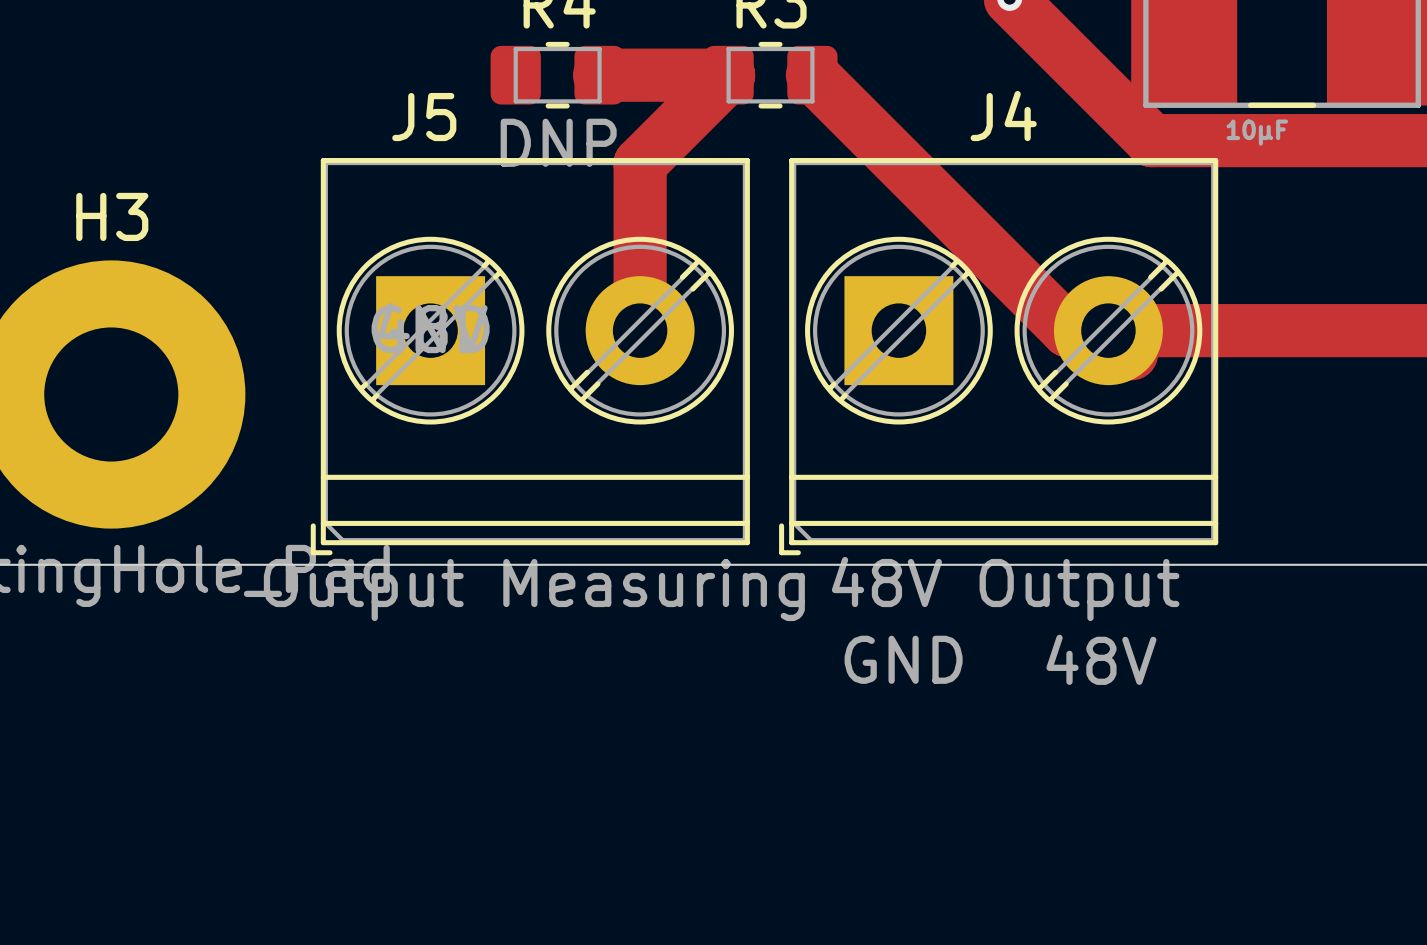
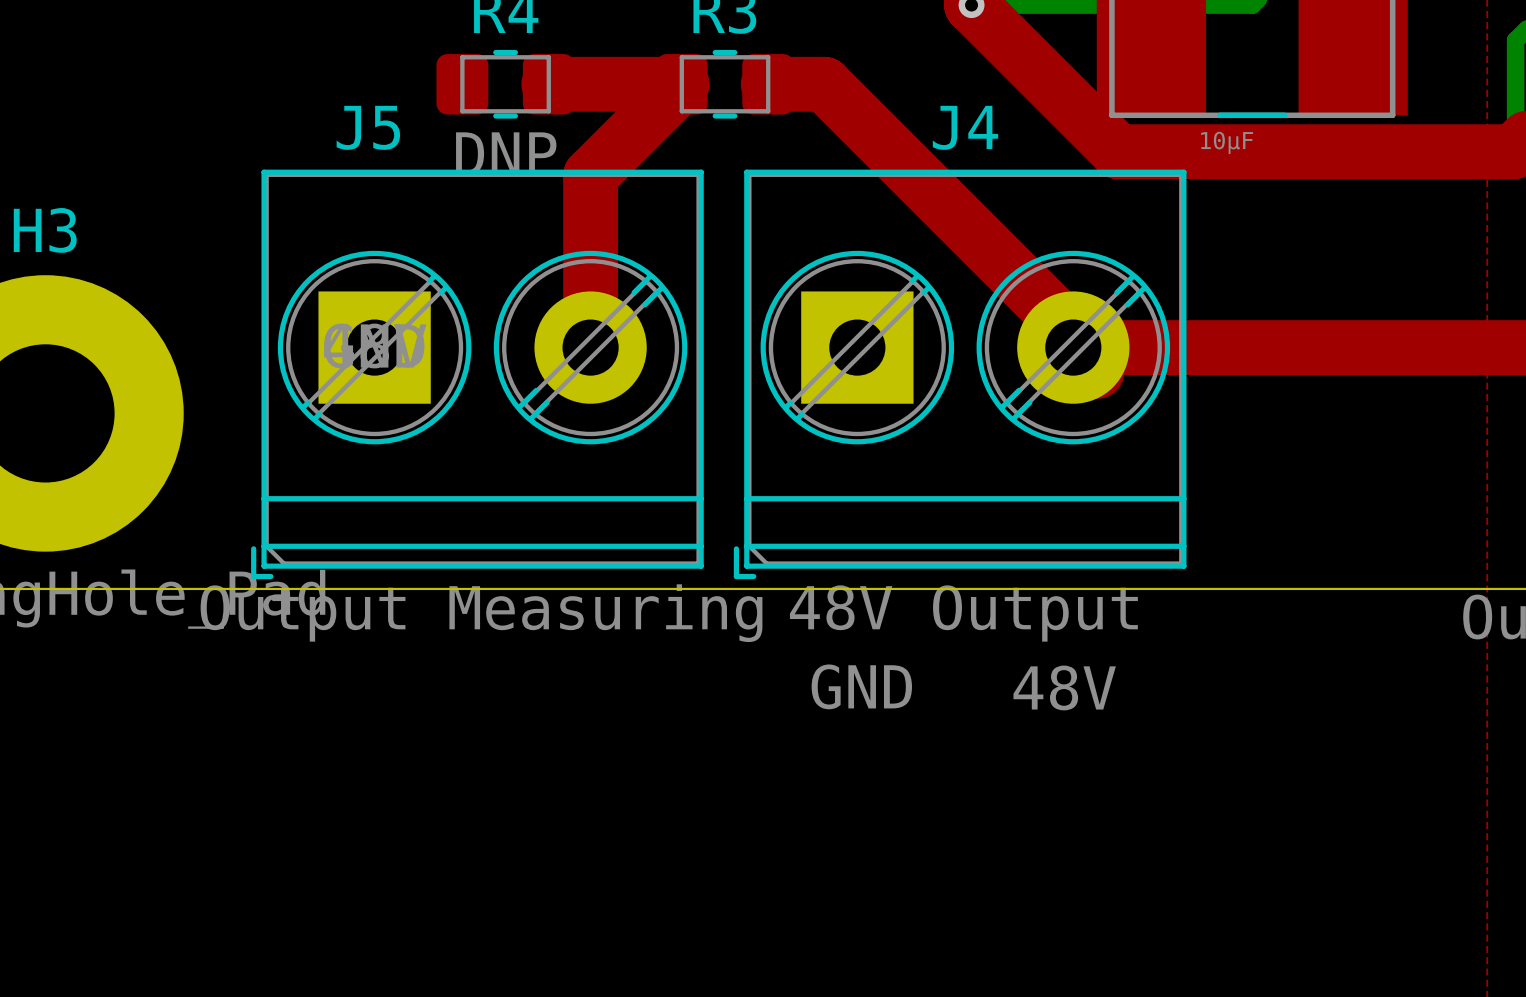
top track: (812, 75) (1067, 330) (1108, 330) -> (768, 84) (824, 84) (1073, 333) (1073, 347)

